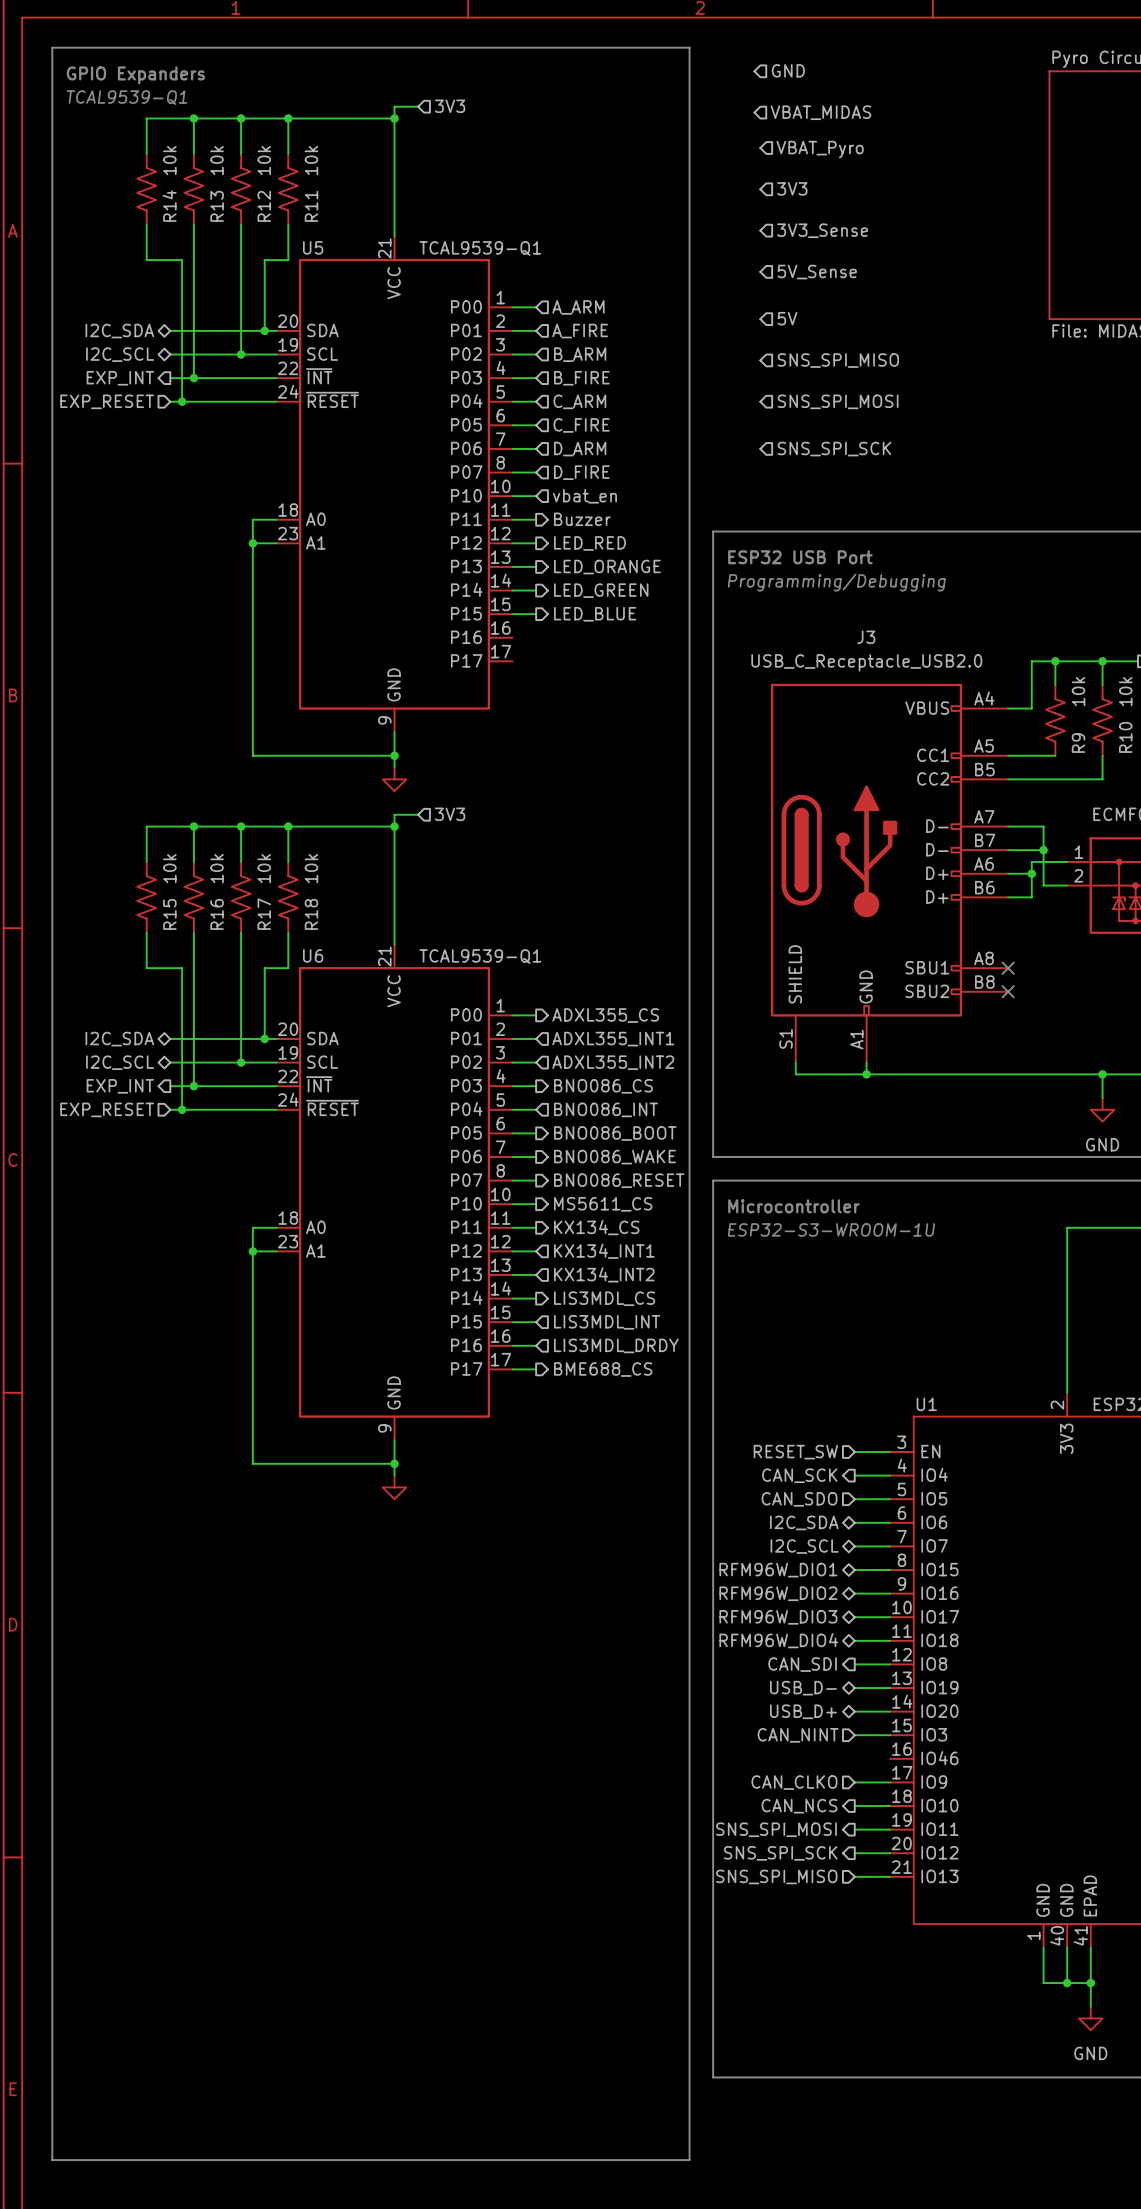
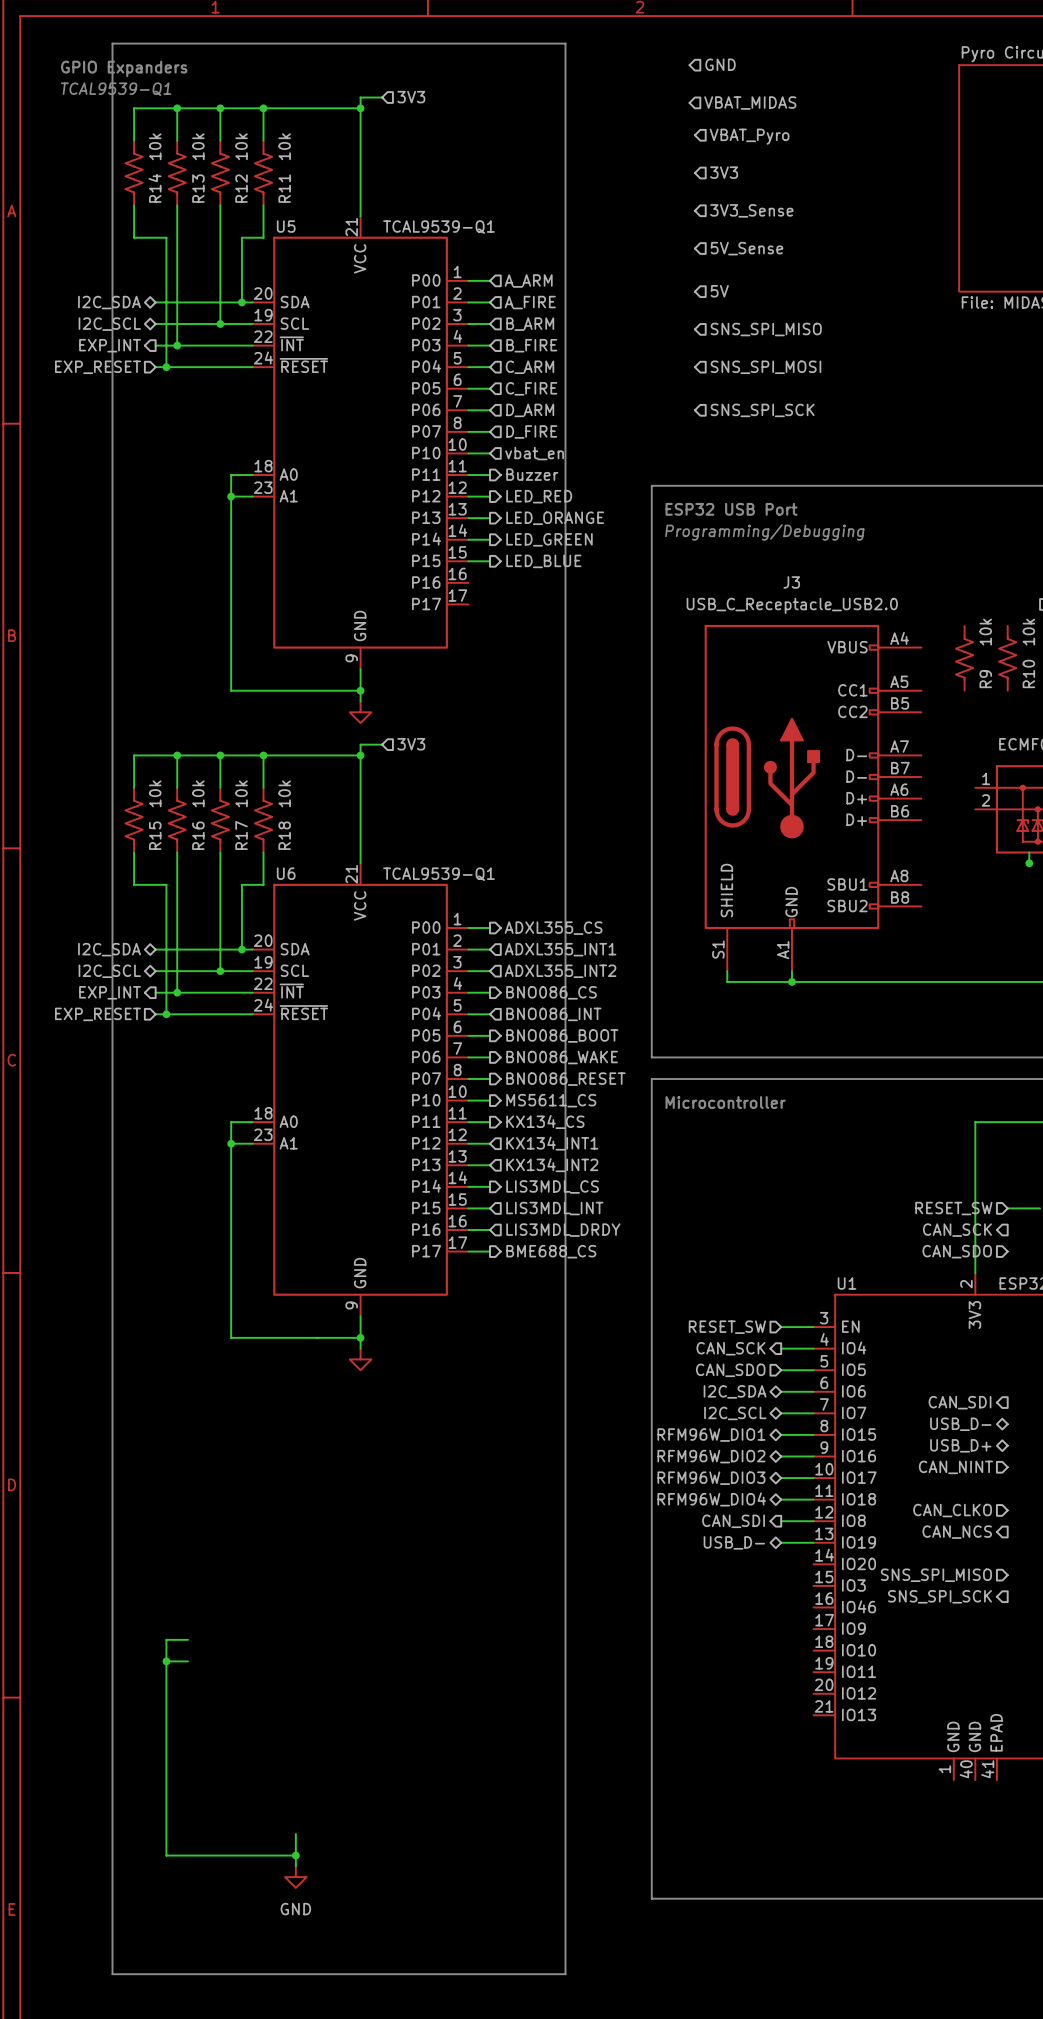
line: (123, 47) (52, 47) (52, 2160) (123, 2160) -> (112, 43) (112, 1974)
line: (618, 47) (689, 47) (689, 2160) (618, 2160) -> (565, 43) (565, 1974)
wire: (1055, 661) (1055, 684) -> none
junction: (1055, 661) -> none
wire: (1102, 661) (1102, 684) -> none
junction: (1102, 661) -> none
wire: (1137, 661) (1031, 661) (1031, 708) (1008, 708) -> none
wire: (1008, 755) (1055, 755) -> none
wire: (1102, 755) (1102, 779) (1008, 779) -> none
wire: (1008, 826) (1043, 826) (1043, 885) (1067, 885) -> none
wire: (1008, 850) (1043, 850) -> none
junction: (1043, 850) -> none
wire: (1067, 861) (1031, 861) (1031, 897) (1008, 897) -> none
wire: (1008, 873) (1031, 873) -> none
junction: (1031, 873) -> none
wire: none -> (1029, 852) (1029, 863)
junction: none -> (1029, 863)
no-connect mark: (1008, 968) -> none
no-connect mark: (1008, 991) -> none
wire: (1102, 1074) (1102, 1097) -> none
junction: (1102, 1074) -> none
power symbol: GND (1102, 1109) -> none
text: ESP32-S3-WROOM-1U (831, 1229) -> none
hierarchical label: none -> RESET_SW (953, 1208)
wire: none -> (1007, 1208) (1040, 1208)
hierarchical label: none -> CAN_SCK (957, 1230)
hierarchical label: none -> CAN_SDO (957, 1251)
hierarchical label: none -> CAN_SDI (960, 1402)
hierarchical label: none -> USB_D- (960, 1424)
hierarchical label: none -> USB_D+ (960, 1445)
hierarchical label: none -> CAN_NINT (955, 1467)
hierarchical label: none -> CAN_CLKO (952, 1510)
hierarchical label: none -> CAN_NCS (957, 1532)
hierarchical label: USB_D+ (803, 1711) -> none
wire: (854, 1711) (890, 1711) -> none
hierarchical label: none -> SNS_SPI_MISO (936, 1575)
hierarchical label: CAN_NINT (798, 1735) -> none
wire: (854, 1735) (890, 1735) -> none
hierarchical label: none -> SNS_SPI_SCK (940, 1596)
hierarchical label: CAN_CLKO (794, 1782) -> none
wire: (854, 1782) (890, 1782) -> none
wire: none -> (188, 1639) (166, 1639) (166, 1855) (295, 1855)
hierarchical label: CAN_NCS (799, 1806) -> none
wire: (854, 1806) (890, 1806) -> none
wire: none -> (166, 1661) (188, 1661)
junction: none -> (166, 1661)
hierarchical label: SNS_SPI_MOSI (776, 1829) -> none
wire: (854, 1829) (890, 1829) -> none
hierarchical label: SNS_SPI_SCK (780, 1853) -> none
wire: (854, 1853) (890, 1853) -> none
hierarchical label: SNS_SPI_MISO (776, 1876) -> none
wire: (854, 1876) (890, 1876) -> none
wire: (1043, 1947) (1043, 1983) (1090, 1983) -> none
wire: (1067, 1947) (1067, 1983) -> none
wire: (1090, 1947) (1090, 2006) -> none
junction: (1067, 1983) -> none
junction: (1090, 1983) -> none
wire: none -> (295, 1833) (295, 1866)
power symbol: GND (1090, 2018) -> none
junction: none -> (295, 1855)
power symbol: none -> GND (295, 1877)

